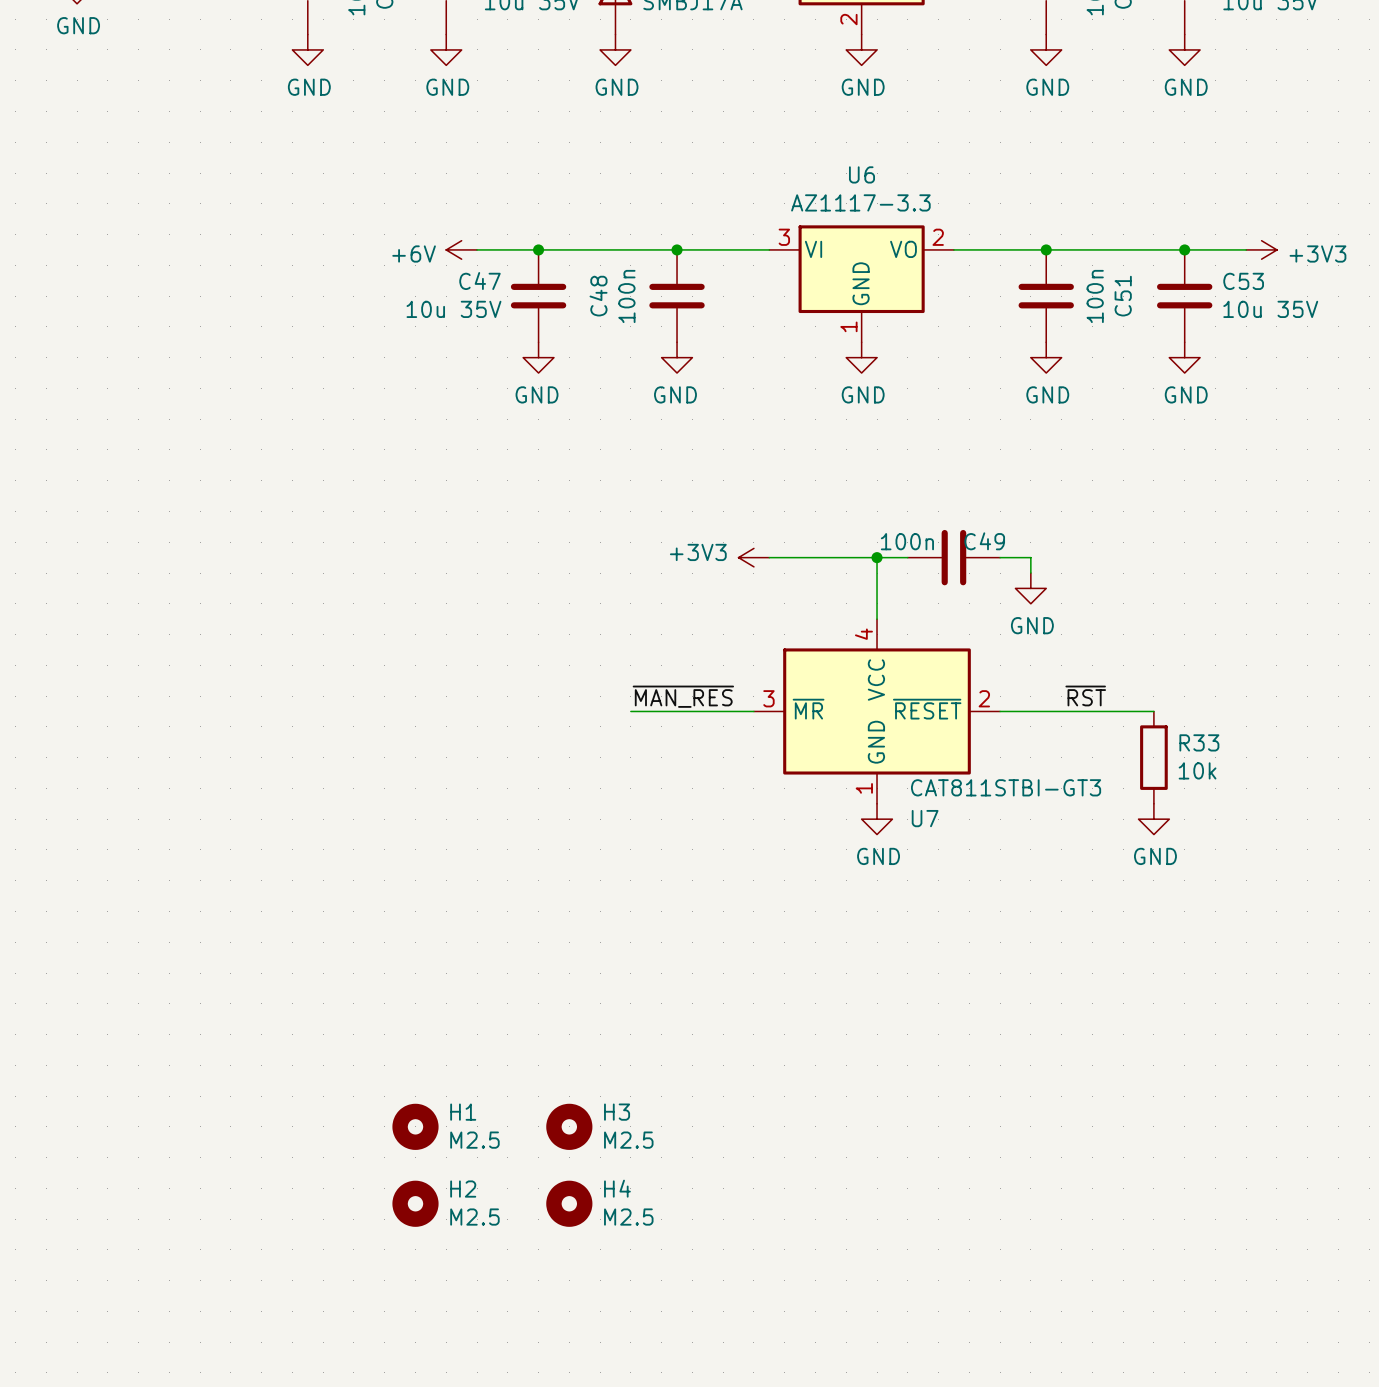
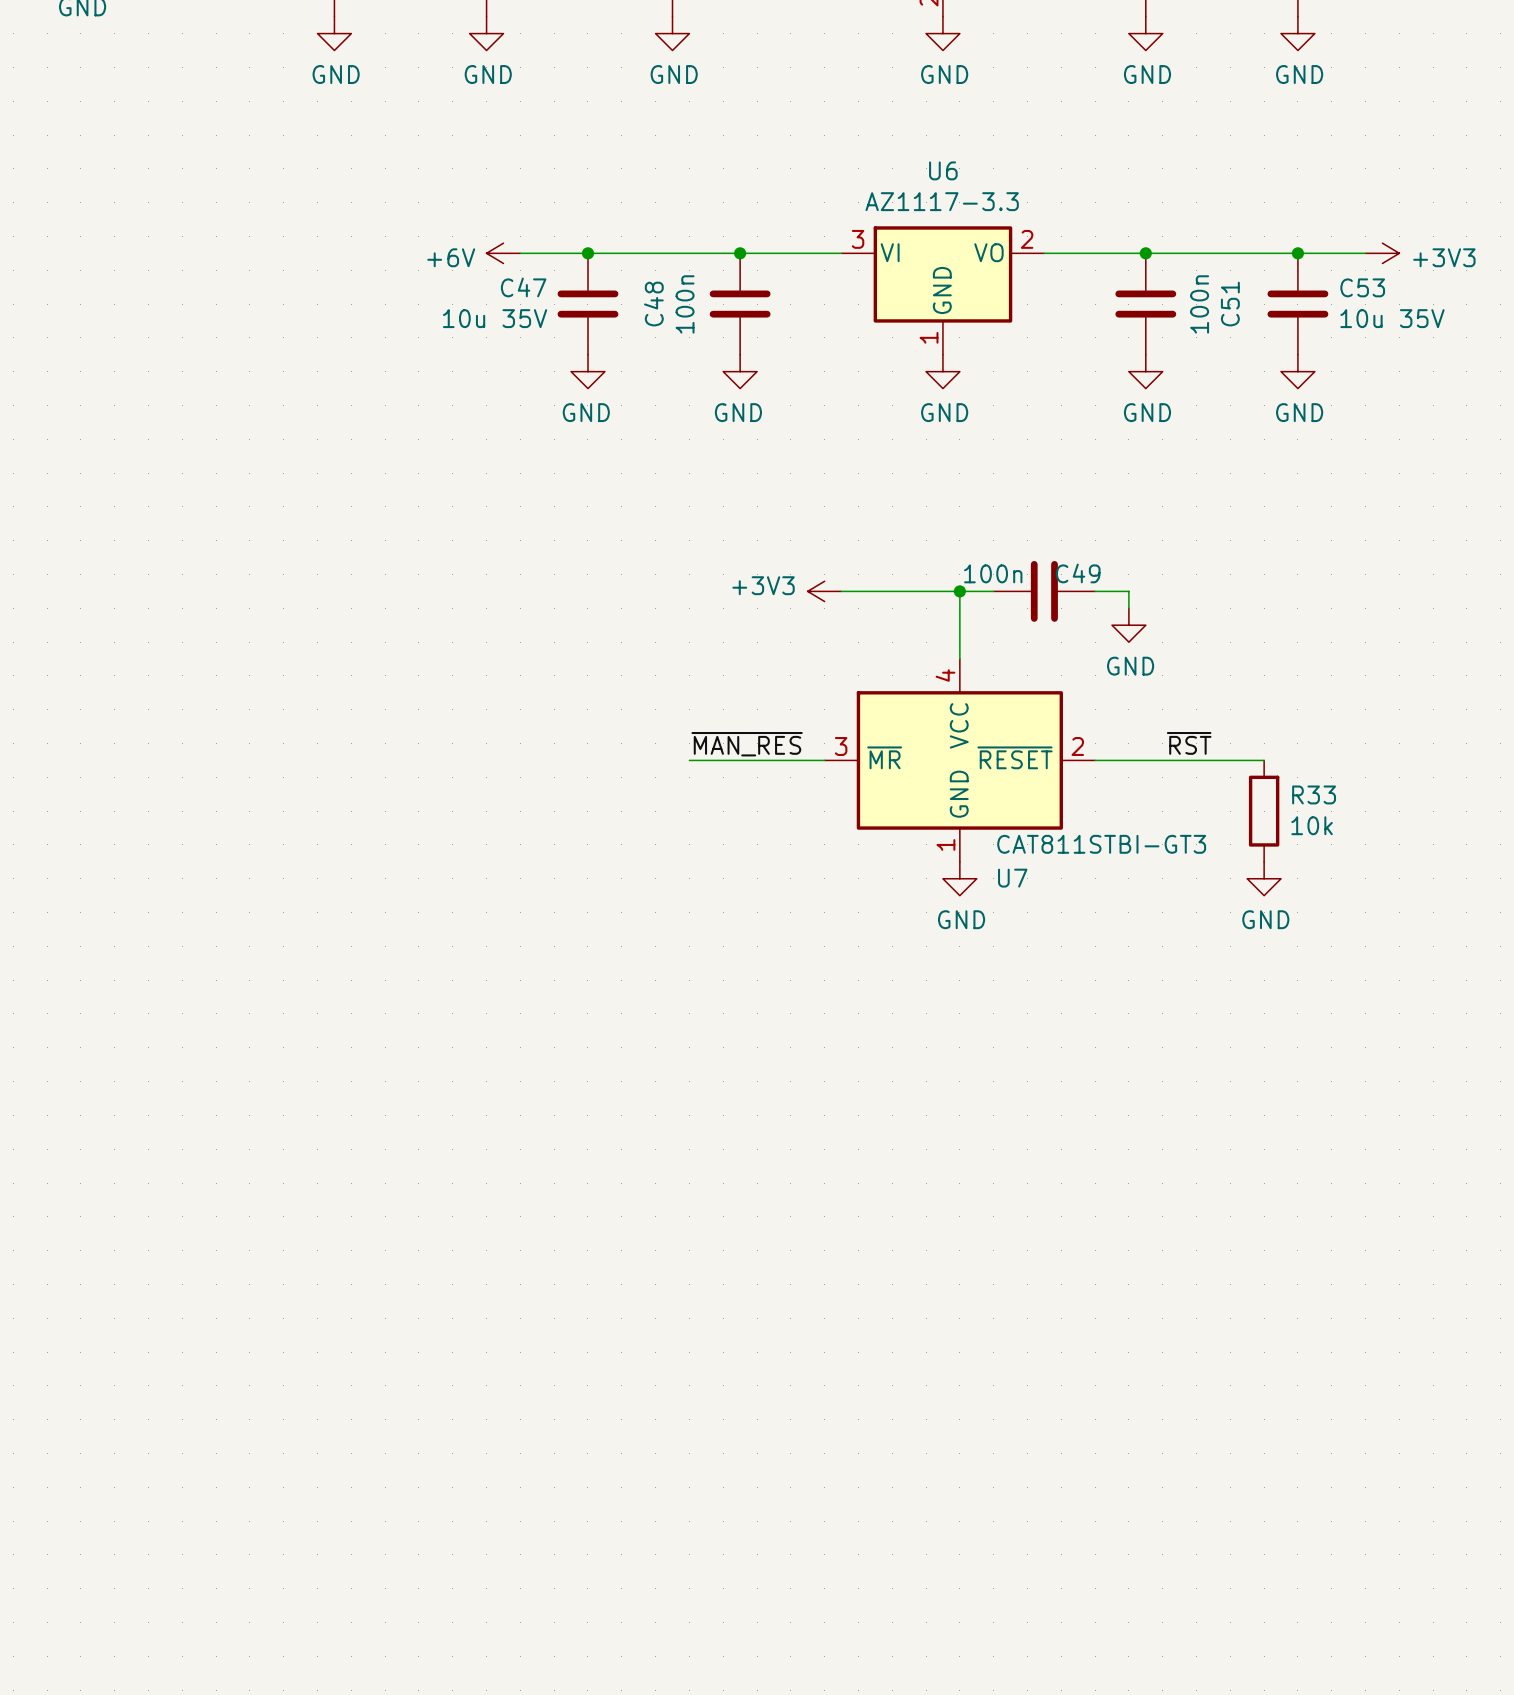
H1: M2.5 (415, 1126) -> none
H3: M2.5 (569, 1126) -> none
H2: M2.5 (415, 1203) -> none
H4: M2.5 (569, 1203) -> none

